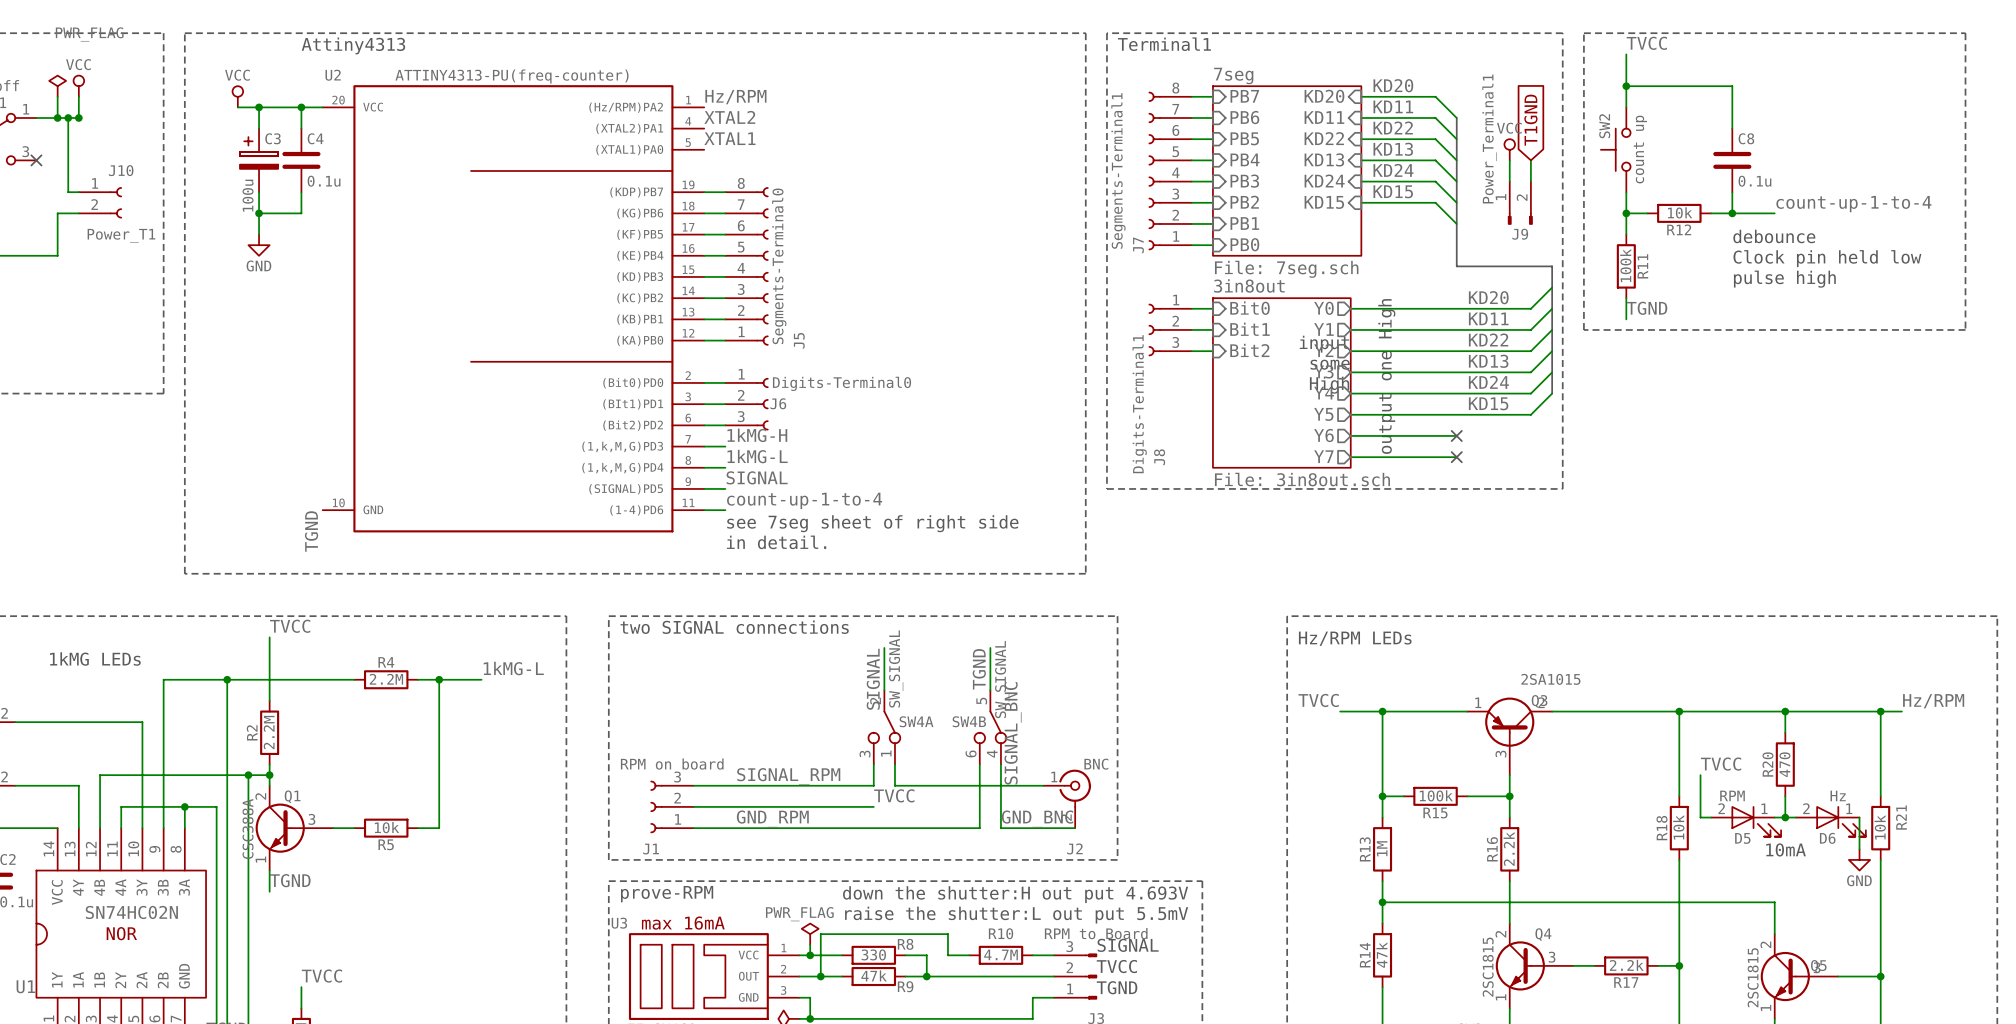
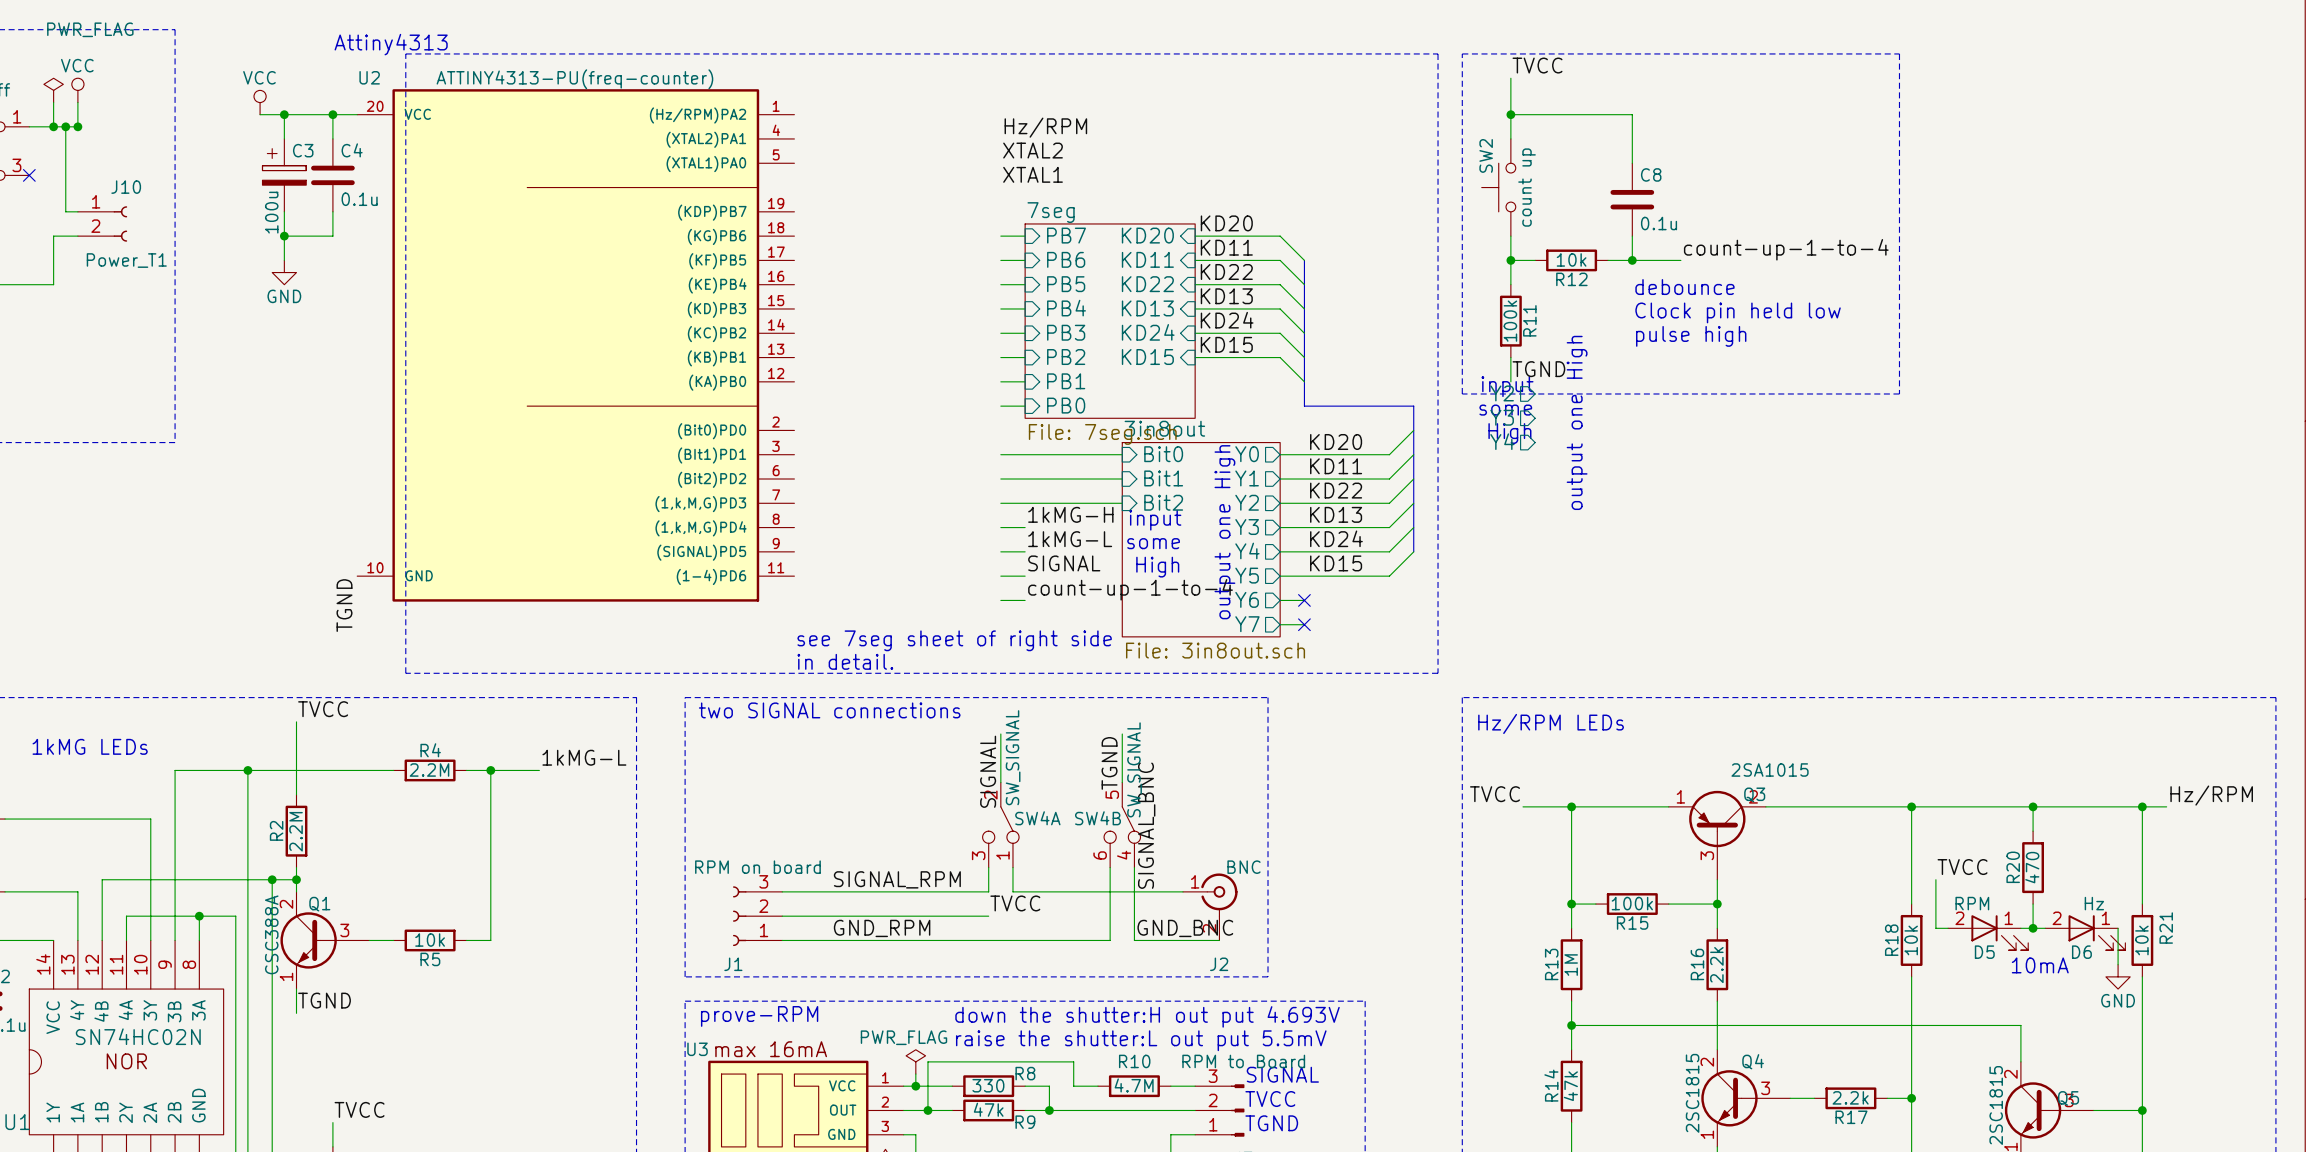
line: (184, 33) (1085, 33) (1085, 573) (184, 573) (184, 33) -> (405, 53) (1438, 53) (1438, 673) (405, 673) (405, 53)
line: (1106, 33) (1562, 33) (1562, 488) (1106, 488) (1106, 33) -> none
line: (1583, 33) (1583, 329) (1965, 329) (1965, 33) (1583, 33) -> none
label: TVCC (1646, 43) -> none
text: Terminal1 (1164, 44) -> none
line: none -> (1462, 53) (1462, 393) (1899, 393) (1899, 53) (1462, 53)
wire: (1626, 54) (1626, 107) -> none
label: none -> TVCC (1537, 65)
wire: none -> (1510, 78) (1510, 138)
label: KD20 (1393, 85) -> none
wire: (1626, 86) (1732, 86) (1732, 128) -> none
junction: (1626, 86) -> none
wire: (1191, 96) (1212, 96) -> none
sheet pin: PB7 (1244, 96) -> none
sheet pin: KD20 (1324, 96) -> none
wire: (1361, 96) (1435, 96) (1456, 117) -> none
label position: Hz/RPM (735, 97) -> Hz/RPM (1045, 127)
label: KD11 (1393, 106) -> none
wire: none -> (1510, 114) (1632, 114) (1632, 163)
junction: none -> (1510, 114)
label position: XTAL2 (729, 117) -> XTAL2 (1033, 150)
wire: (1191, 117) (1212, 117) -> none
sheet pin: PB6 (1244, 117) -> none
sheet pin: KD11 (1324, 117) -> none
wire: (1361, 117) (1435, 117) (1456, 139) -> none
bus: (1456, 117) (1456, 266) (1552, 266) (1552, 393) -> none
global label: T1GND (1530, 120) -> none
label: KD22 (1393, 127) -> none
label position: XTAL1 (729, 138) -> XTAL1 (1033, 174)
sheet pin: PB5 (1244, 138) -> none
sheet pin: KD22 (1324, 138) -> none
wire: (1191, 139) (1212, 139) -> none
wire: (1361, 139) (1435, 139) (1456, 160) -> none
label: KD13 (1393, 149) -> none
power symbol: VCC (1509, 149) -> none
SW2 position: (1615, 149) -> (1498, 187)
sheet pin: PB4 (1245, 159) -> none
sheet pin: KD13 (1324, 159) -> none
wire: (1191, 160) (1212, 160) -> none
wire: (1361, 160) (1435, 160) (1456, 181) -> none
wire: (1509, 160) (1509, 181) -> (1632, 236) (1632, 260)
wire: (1530, 160) (1530, 181) -> none
C8 position: (1732, 160) -> (1632, 199)
J7: Segments-Terminal1 (1170, 170) -> none
sheet 7seg position: (1287, 170) -> (1110, 321)
label: KD24 (1393, 170) -> none
wire: (1191, 181) (1212, 181) -> none
sheet pin: PB3 (1244, 181) -> none
sheet pin: KD24 (1324, 181) -> none
wire: (1361, 181) (1435, 181) (1456, 202) -> none
label: KD15 (1393, 191) -> none
wire: (704, 192) (725, 192) -> (1000, 236) (1025, 236)
wire: (1626, 192) (1626, 234) -> none
wire: (1732, 192) (1732, 213) -> none
label: none -> KD20 (1226, 223)
wire: (1191, 202) (1212, 202) -> none
sheet pin: PB2 (1244, 202) -> none
sheet pin: KD15 (1324, 202) -> none
wire: (1361, 202) (1435, 202) (1456, 223) -> none
J9: Power_Terminal1 (1520, 203) -> none
label: count-up-1-to-4 (1853, 204) -> none
sheet pin: none -> PB7 (1066, 235)
sheet pin: none -> KD20 (1147, 235)
wire: (704, 213) (725, 213) -> (1000, 260) (1025, 260)
wire: none -> (1195, 236) (1280, 236) (1304, 260)
wire: none -> (1510, 236) (1510, 284)
wire: (1626, 213) (1647, 213) -> none
junction: (1626, 213) -> none
R12 position: (1679, 213) -> (1571, 260)
wire: (1711, 213) (1774, 213) -> none
junction: (1732, 213) -> none
label: none -> KD11 (1226, 247)
wire: (1191, 223) (1212, 223) -> (1510, 260) (1535, 260)
sheet pin: PB1 (1244, 223) -> none
label: none -> count-up-1-to-4 (1786, 249)
wire: (704, 234) (725, 234) -> (1000, 284) (1025, 284)
sheet pin: none -> PB6 (1066, 259)
sheet pin: none -> KD11 (1147, 259)
wire: none -> (1195, 260) (1280, 260) (1304, 284)
bus: none -> (1304, 260) (1304, 406) (1413, 406) (1413, 551)
junction: none -> (1510, 260)
wire: none -> (1608, 260) (1680, 260)
junction: none -> (1632, 260)
text: debounce (1774, 236) -> none
label: none -> KD22 (1226, 271)
sheet pin: PB0 (1244, 244) -> none
wire: (1191, 245) (1212, 245) -> none
wire: (704, 255) (725, 255) -> (1000, 308) (1025, 308)
sheet pin: none -> PB5 (1066, 284)
sheet pin: none -> KD22 (1147, 284)
wire: none -> (1195, 284) (1280, 284) (1304, 308)
text: none -> debounce (1684, 287)
text: Clock pin held low (1827, 258) -> none
label: none -> KD13 (1226, 296)
J5: Segments-Terminal0 (746, 266) -> none
R11 position: (1626, 266) -> (1510, 321)
wire: (704, 276) (725, 276) -> (1000, 333) (1025, 333)
sheet pin: none -> PB4 (1066, 308)
sheet pin: none -> KD13 (1147, 308)
wire: none -> (1195, 308) (1280, 308) (1304, 333)
text: none -> Clock pin held low (1738, 312)
text: pulse high (1784, 279) -> none
label: none -> KD24 (1227, 320)
wire: (1552, 287) (1530, 308) (1350, 308) -> none
sheet pin: none -> PB3 (1066, 332)
sheet pin: none -> KD24 (1148, 332)
label: KD20 (1488, 297) -> none
wire: (704, 298) (725, 298) -> (1000, 357) (1025, 357)
wire: none -> (1195, 333) (1280, 333) (1304, 357)
wire: (1626, 298) (1626, 319) -> none
text: none -> pulse high (1691, 336)
label: none -> KD15 (1226, 344)
wire: (1191, 308) (1212, 308) -> none
sheet pin: Bit0 (1250, 308) -> none
sheet pin: Y0 (1323, 308) -> none
wire: (1552, 308) (1530, 329) (1350, 329) -> none
label: TGND (1646, 308) -> none
sheet pin: none -> PB2 (1066, 357)
label: KD11 (1488, 318) -> none
wire: (704, 319) (725, 319) -> (1000, 381) (1025, 381)
sheet pin: none -> KD15 (1147, 357)
wire: none -> (1195, 357) (1280, 357) (1304, 381)
wire: none -> (1510, 357) (1510, 381)
J8: Digits-Terminal1 (1170, 329) -> none
wire: (1191, 329) (1212, 329) -> none
sheet pin: Bit1 (1249, 329) -> none
sheet pin: Y1 (1323, 329) -> none
label: none -> TGND (1538, 369)
wire: (1552, 329) (1530, 351) (1350, 351) -> none
label: KD22 (1488, 339) -> none
wire: (704, 340) (725, 340) -> (1000, 406) (1025, 406)
sheet pin: none -> PB1 (1066, 381)
sheet pin: Bit2 (1249, 350) -> none
wire: (1191, 351) (1212, 351) -> (1280, 600) (1304, 600)
wire: (1552, 351) (1530, 372) (1350, 372) -> none
sheet pin: none -> PB0 (1066, 405)
label: KD13 (1488, 361) -> none
wire: (1552, 372) (1530, 393) (1350, 393) -> none
wire: (704, 382) (725, 382) -> none
wire: none -> (1413, 430) (1389, 454) (1280, 454)
sheet 3in8out position: (1281, 382) -> (1201, 539)
label: KD24 (1488, 382) -> none
label: none -> KD20 (1336, 442)
wire: (1552, 393) (1530, 414) (1350, 414) -> none
sheet pin: none -> Bit0 (1163, 454)
sheet pin: none -> Y0 (1247, 454)
label: KD15 (1488, 403) -> none
wire: (704, 404) (725, 404) -> none
J6: Digits-Terminal0 (746, 404) -> none
wire: none -> (1000, 454) (1122, 454)
wire: none -> (1413, 454) (1389, 479) (1280, 479)
label: none -> KD11 (1336, 466)
sheet pin: Y5 (1323, 414) -> none
sheet pin: none -> Bit1 (1163, 478)
sheet pin: none -> Y1 (1247, 478)
wire: (704, 425) (725, 425) -> none
wire: none -> (1000, 479) (1122, 479)
wire: none -> (1413, 479) (1389, 503) (1280, 503)
label position: 1kMG-H (757, 435) -> 1kMG-H (1070, 514)
label: none -> KD22 (1336, 490)
sheet pin: Y6 (1323, 435) -> none
wire: (1350, 435) (1456, 435) -> none
no-connect mark: (1456, 435) -> none
sheet pin: none -> Bit2 (1163, 502)
sheet pin: none -> Y2 (1247, 502)
wire: (704, 446) (725, 446) -> (1000, 527) (1025, 527)
wire: none -> (1000, 503) (1122, 503)
wire: none -> (1413, 503) (1389, 527) (1280, 527)
label position: 1kMG-L (757, 456) -> 1kMG-L (1070, 539)
label: none -> KD13 (1336, 514)
sheet pin: Y7 (1323, 456) -> none
wire: (1350, 457) (1456, 457) -> none
no-connect mark: (1456, 457) -> none
text: none -> input (1155, 520)
wire: (704, 467) (725, 467) -> (1000, 551) (1025, 551)
sheet pin: none -> Y3 (1247, 527)
wire: none -> (1413, 527) (1389, 551) (1280, 551)
text: none -> output one High (1224, 532)
label position: SIGNAL (757, 477) -> SIGNAL (1064, 563)
label: none -> KD24 (1336, 538)
text: none -> some (1153, 543)
wire: (704, 488) (725, 488) -> (1000, 576) (1025, 576)
sheet pin: none -> Y4 (1247, 550)
wire: none -> (1413, 551) (1389, 576) (1280, 576)
label: none -> KD15 (1336, 563)
label position: count-up-1-to-4 (804, 500) -> count-up-1-to-4 (1130, 589)
text: none -> High (1157, 567)
sheet pin: none -> Y5 (1247, 575)
wire: (704, 510) (725, 510) -> (1000, 600) (1025, 600)
text position: see 7seg sheet of right side (872, 523) -> see 7seg sheet of right side (954, 640)
sheet pin: none -> Y6 (1247, 599)
no-connect mark: none -> (1304, 600)
text position: in detail. (776, 542) -> in detail. (845, 661)
sheet pin: none -> Y7 (1247, 624)
wire: none -> (1280, 624) (1304, 624)
no-connect mark: none -> (1304, 624)

